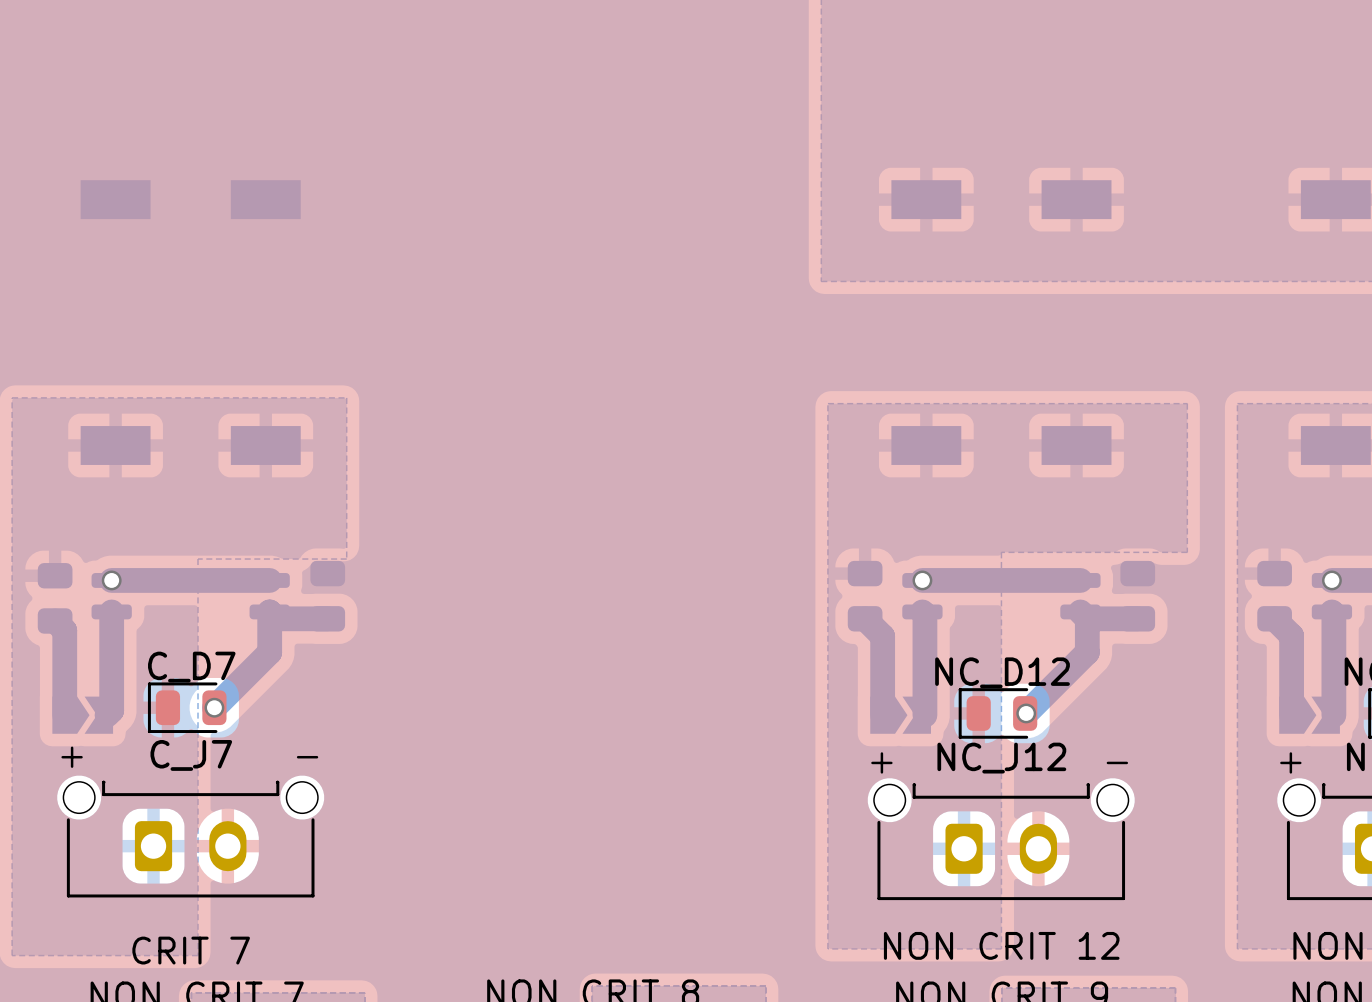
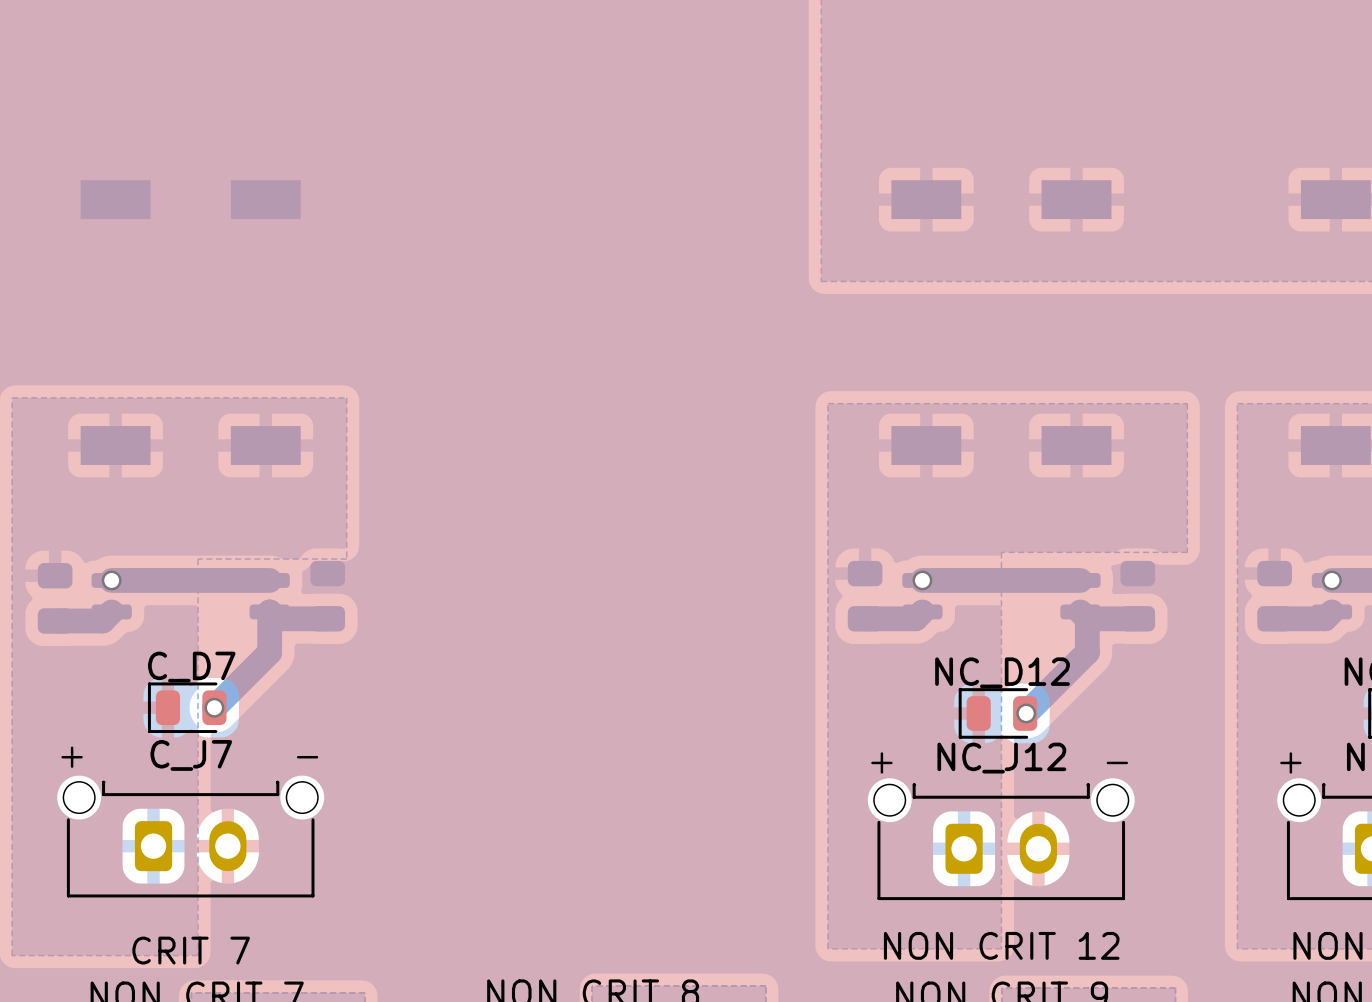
bottom track: (111, 611) (111, 710) (107, 715) -> (111, 611) (102, 620) (55, 620)
bottom track: (922, 611) (924, 614) (924, 715) -> none
bottom track: (1331, 611) (1333, 613) (1333, 715) -> none
bottom track: (865, 618) (882, 636) (882, 715) -> (865, 618) (915, 618) (922, 611)
bottom track: (1274, 618) (1291, 635) (1291, 715) -> (1274, 618) (1325, 618) (1331, 611)
bottom track: (55, 620) (64, 630) (64, 715) -> none

